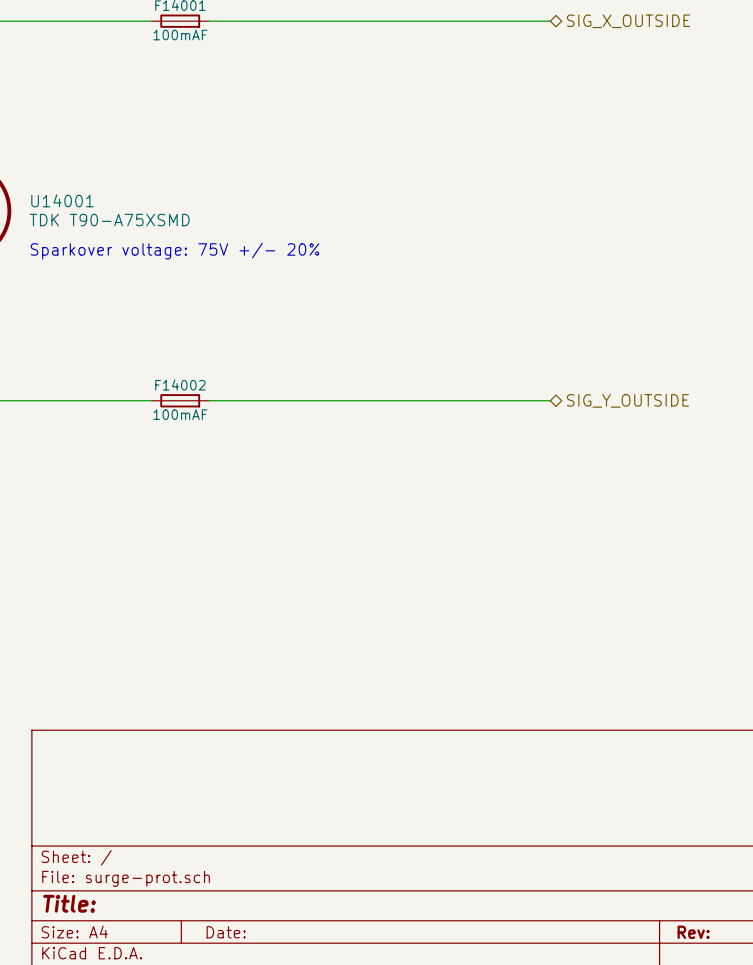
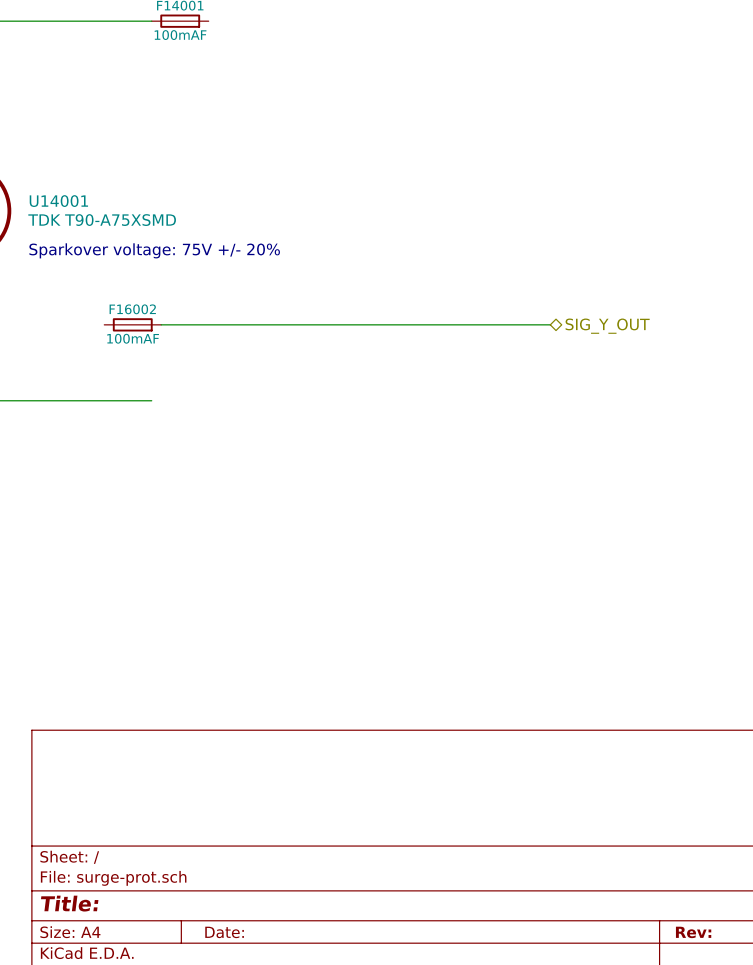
wire: (208, 21) (550, 21) -> none
hierarchical label: SIG_X_OUTSIDE (628, 21) -> none
F16002: none -> 100mAF (132, 324)
wire: none -> (161, 324) (550, 324)
hierarchical label: none -> SIG_Y_OUT (607, 326)
F14002: 100mAF (180, 400) -> none
wire: (208, 400) (550, 400) -> none
hierarchical label: SIG_Y_OUTSIDE (627, 400) -> none

